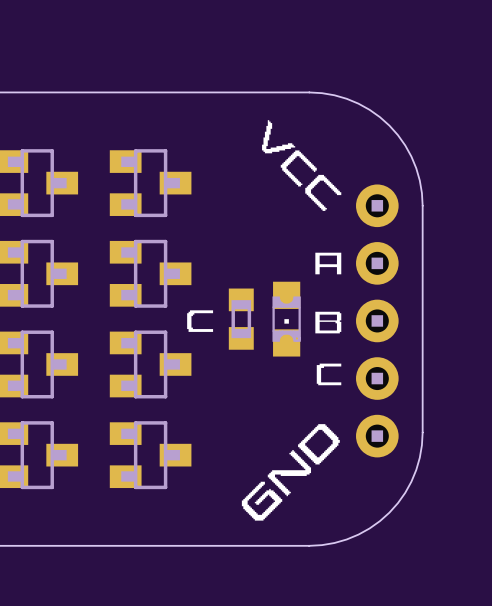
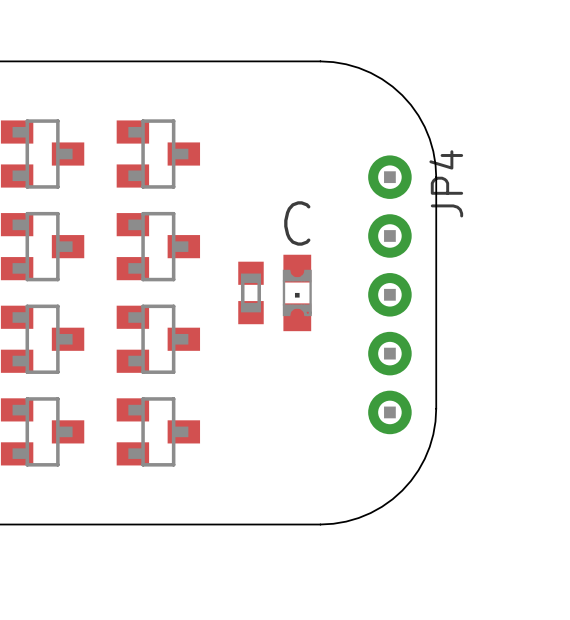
drawing: [262, 120, 342, 211] -> none
JP4 name: none -> JP4 (446, 183)
text: none -> C (297, 223)
drawing: [315, 252, 342, 275] -> none
drawing: [187, 310, 214, 332] -> none
drawing: [315, 311, 342, 334] -> none
drawing: [316, 363, 342, 386] -> none
drawing: [241, 424, 340, 521] -> none

